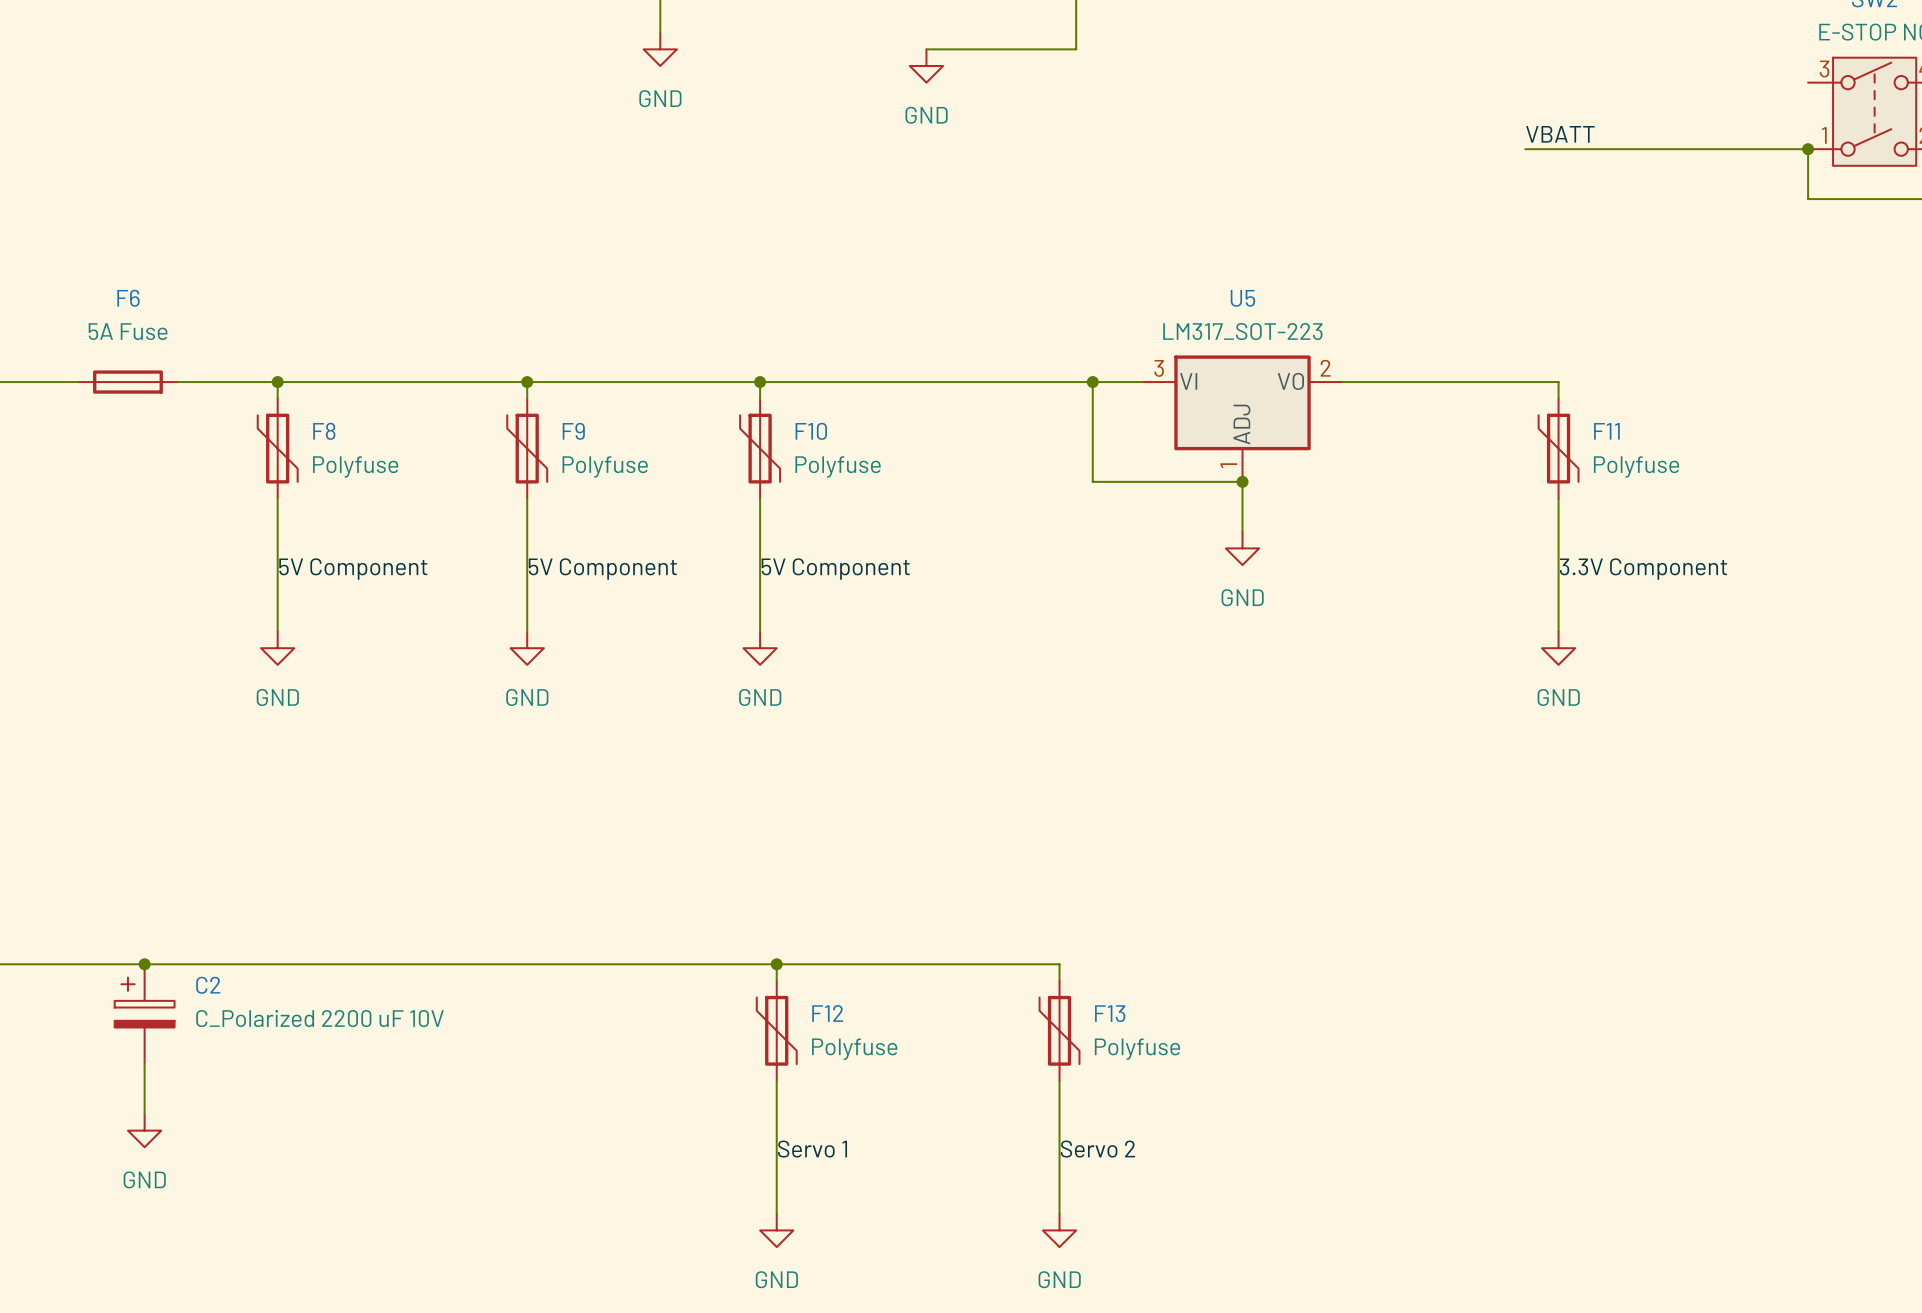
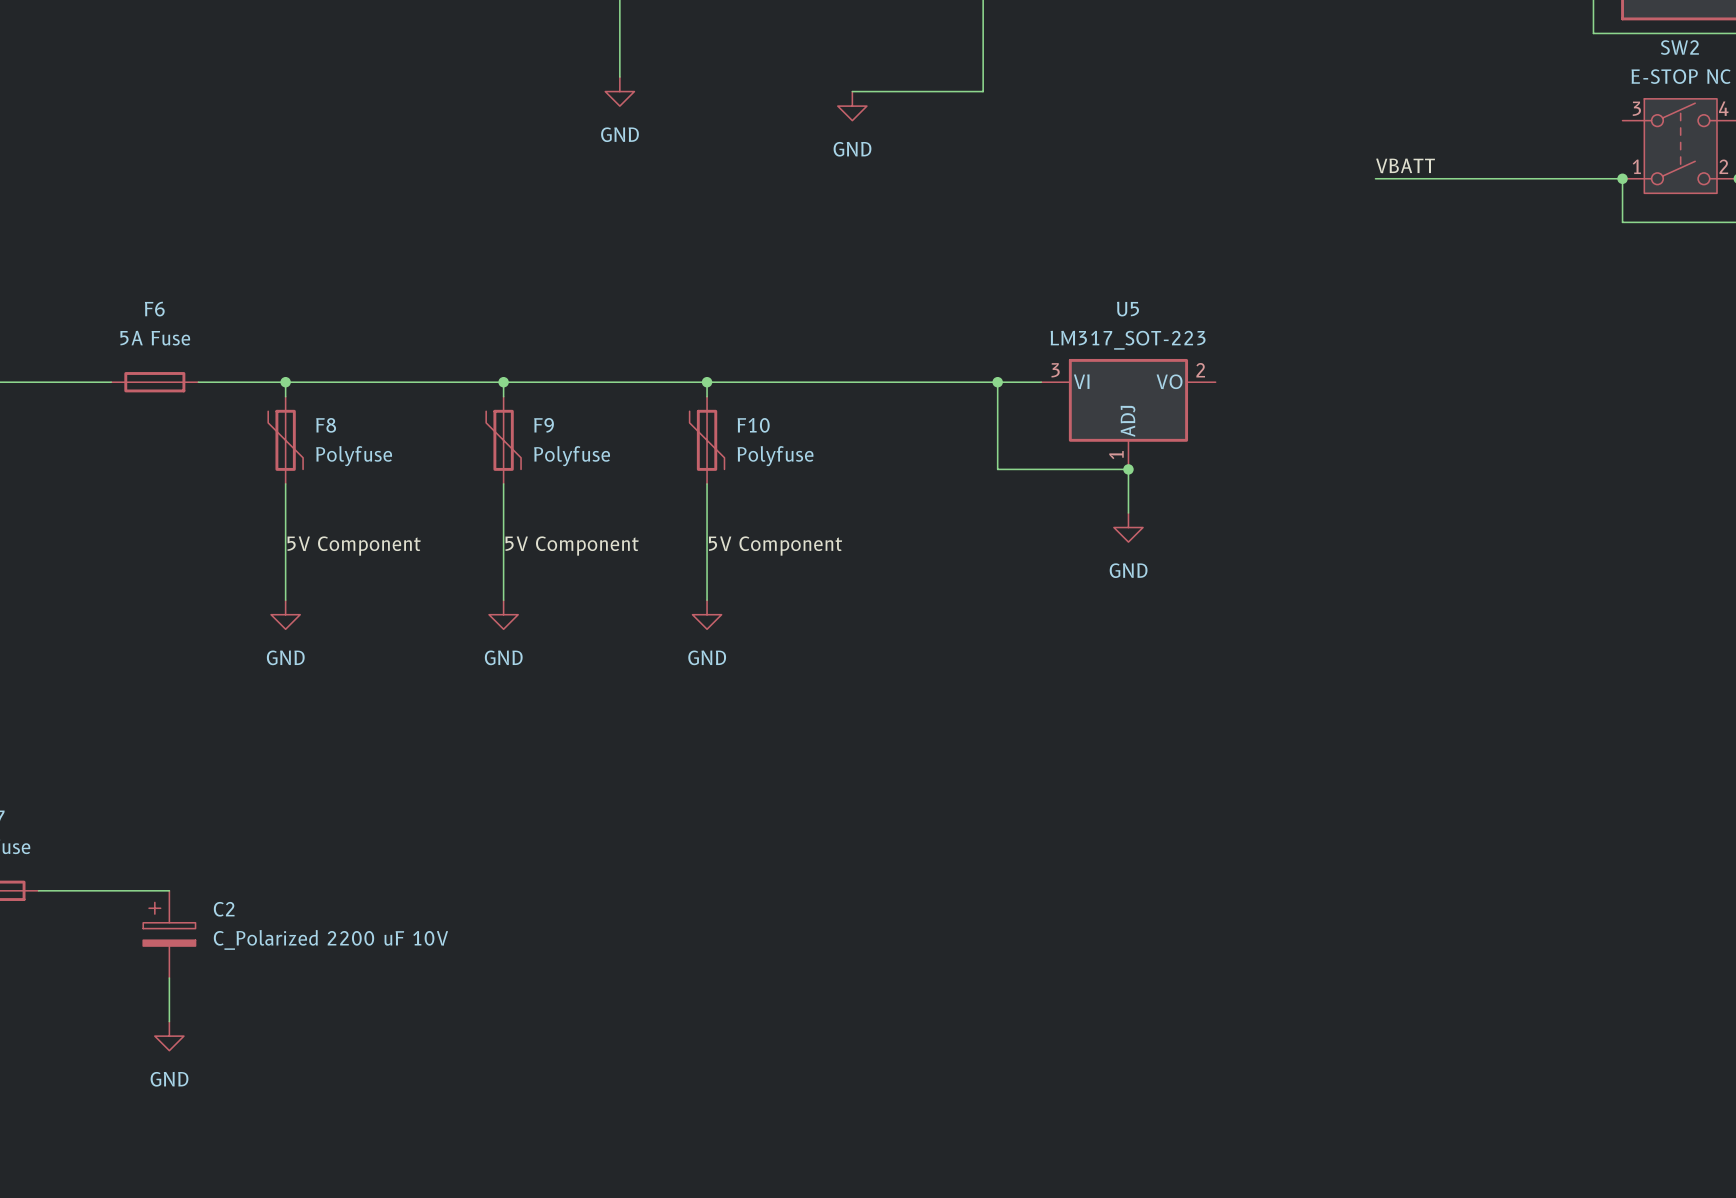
wire: (1342, 382) (1558, 382) (1558, 398) -> none
F11: Polyfuse (1558, 448) -> none
wire: (1558, 498) (1558, 631) -> none
label: 3.3V Component (1643, 569) -> none
power symbol: GND (1558, 648) -> none
wire: (144, 964) (1059, 964) (1059, 980) -> none
junction: (144, 964) -> none
wire: (776, 964) (776, 980) -> none
junction: (776, 964) -> none
F12: Polyfuse (776, 1030) -> none
F13: Polyfuse (1059, 1030) -> none
wire: (776, 1080) (776, 1213) -> none
wire: (1059, 1080) (1059, 1213) -> none
label: Servo 1 (812, 1149) -> none
label: Servo 2 (1097, 1149) -> none
power symbol: GND (776, 1230) -> none
power symbol: GND (1059, 1230) -> none

